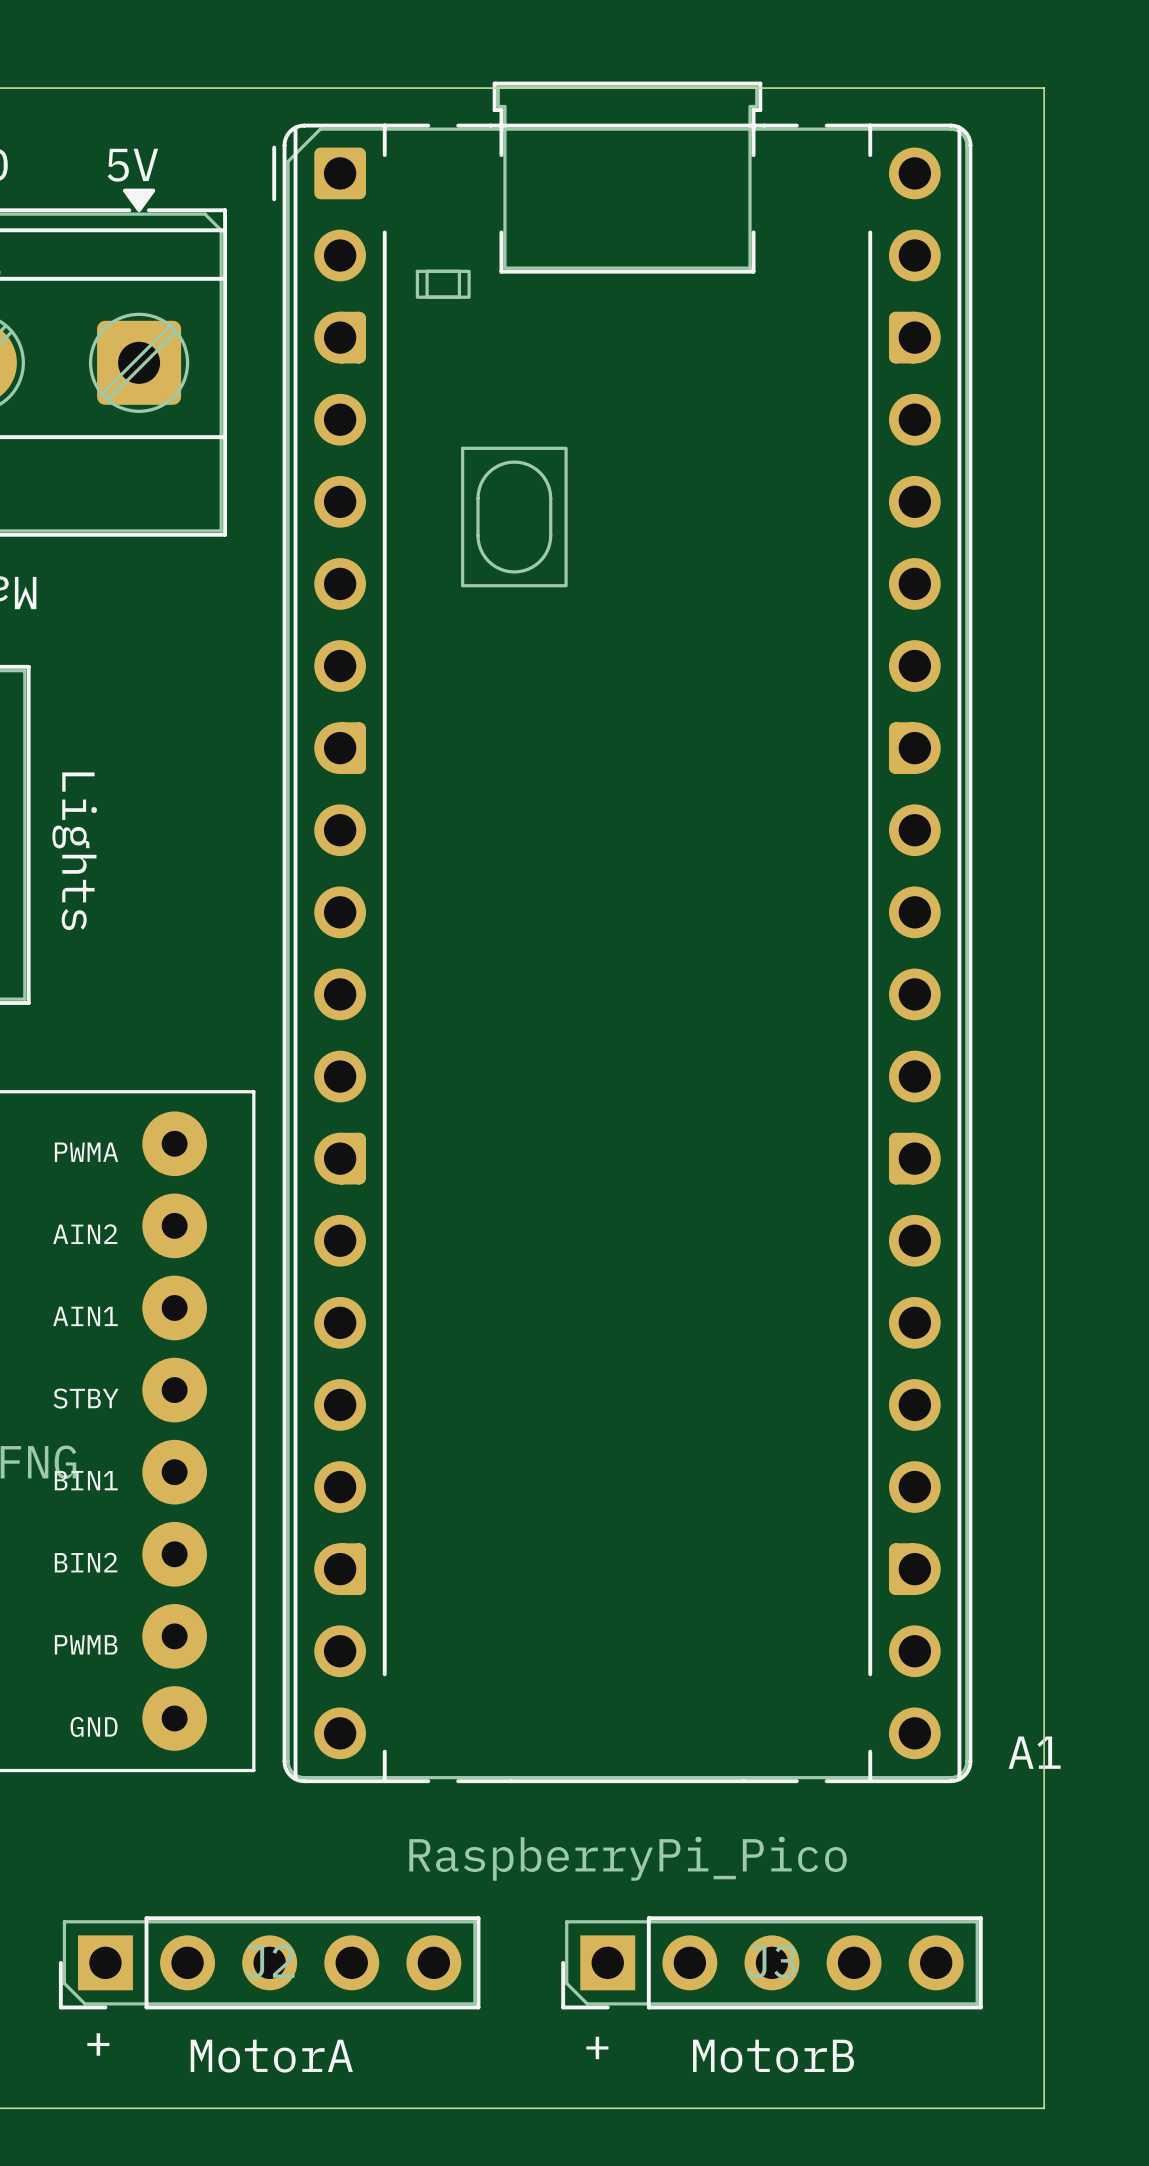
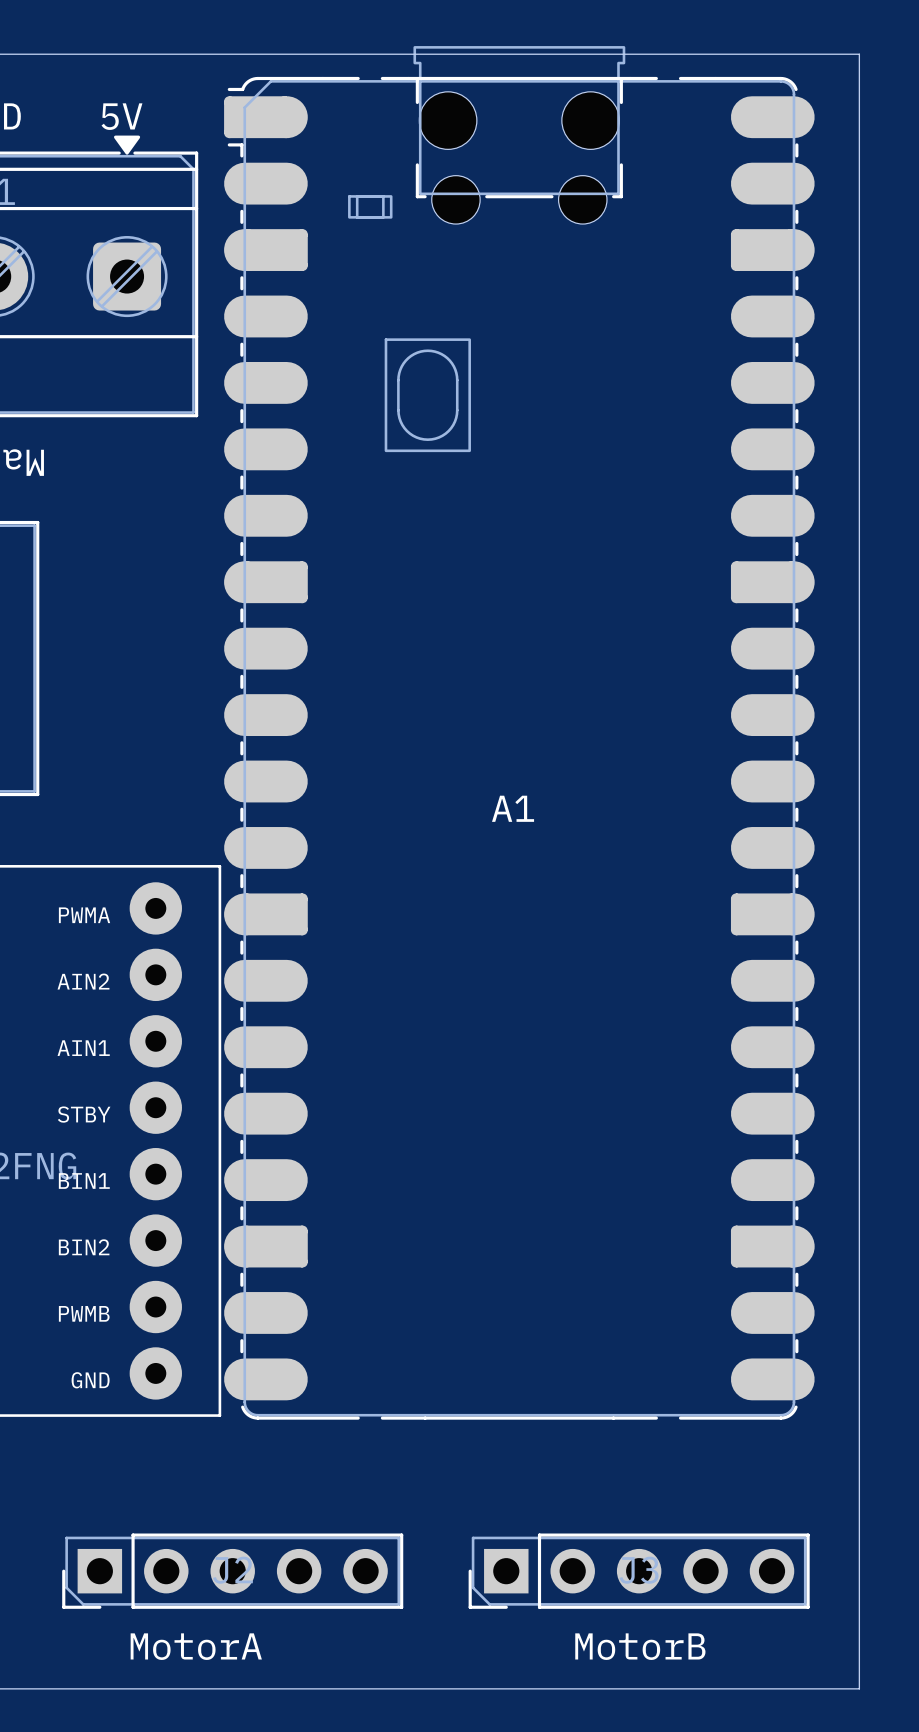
A1 footprint: [272, 81, 973, 1784] -> [224, 46, 815, 1420]
text: Lights (74, 851) -> none
A1 name position: A1 (1034, 1752) -> A1 (513, 808)
A1 value: RaspberryPi_Pico (628, 1858) -> none
text: + (98, 2044) -> none
text: + (597, 2047) -> none
text position: MotorA (271, 2056) -> MotorA (196, 1646)

